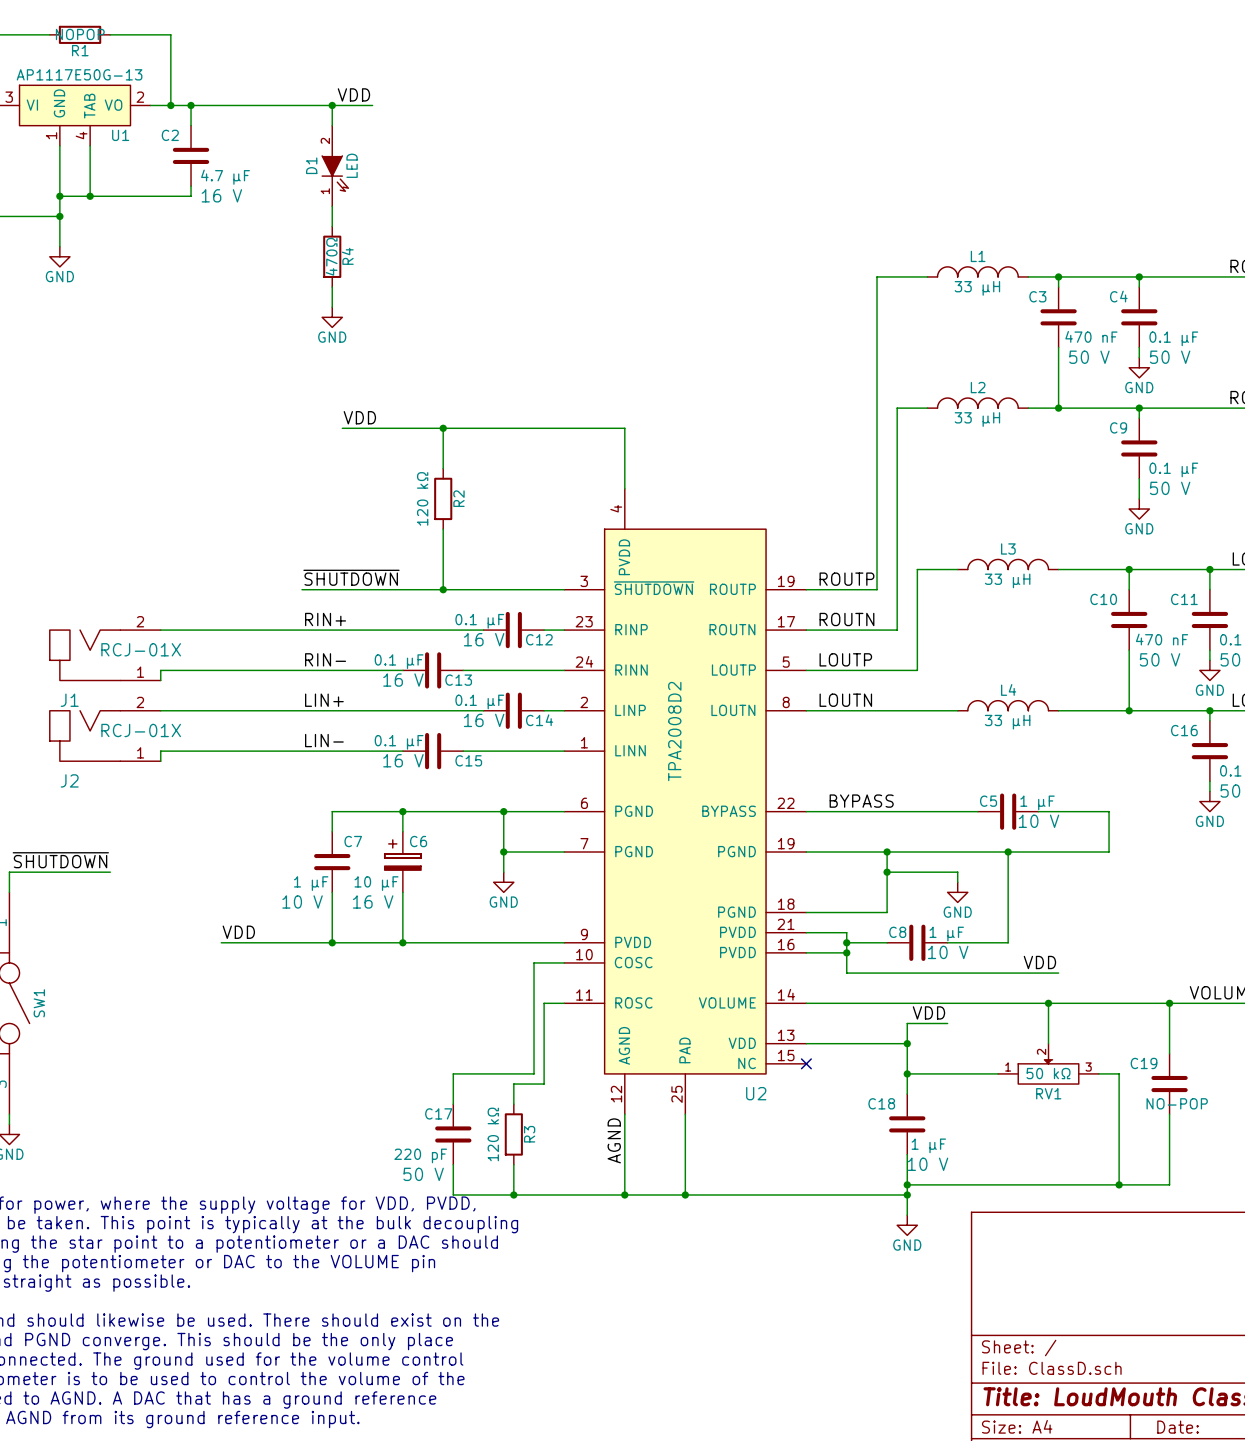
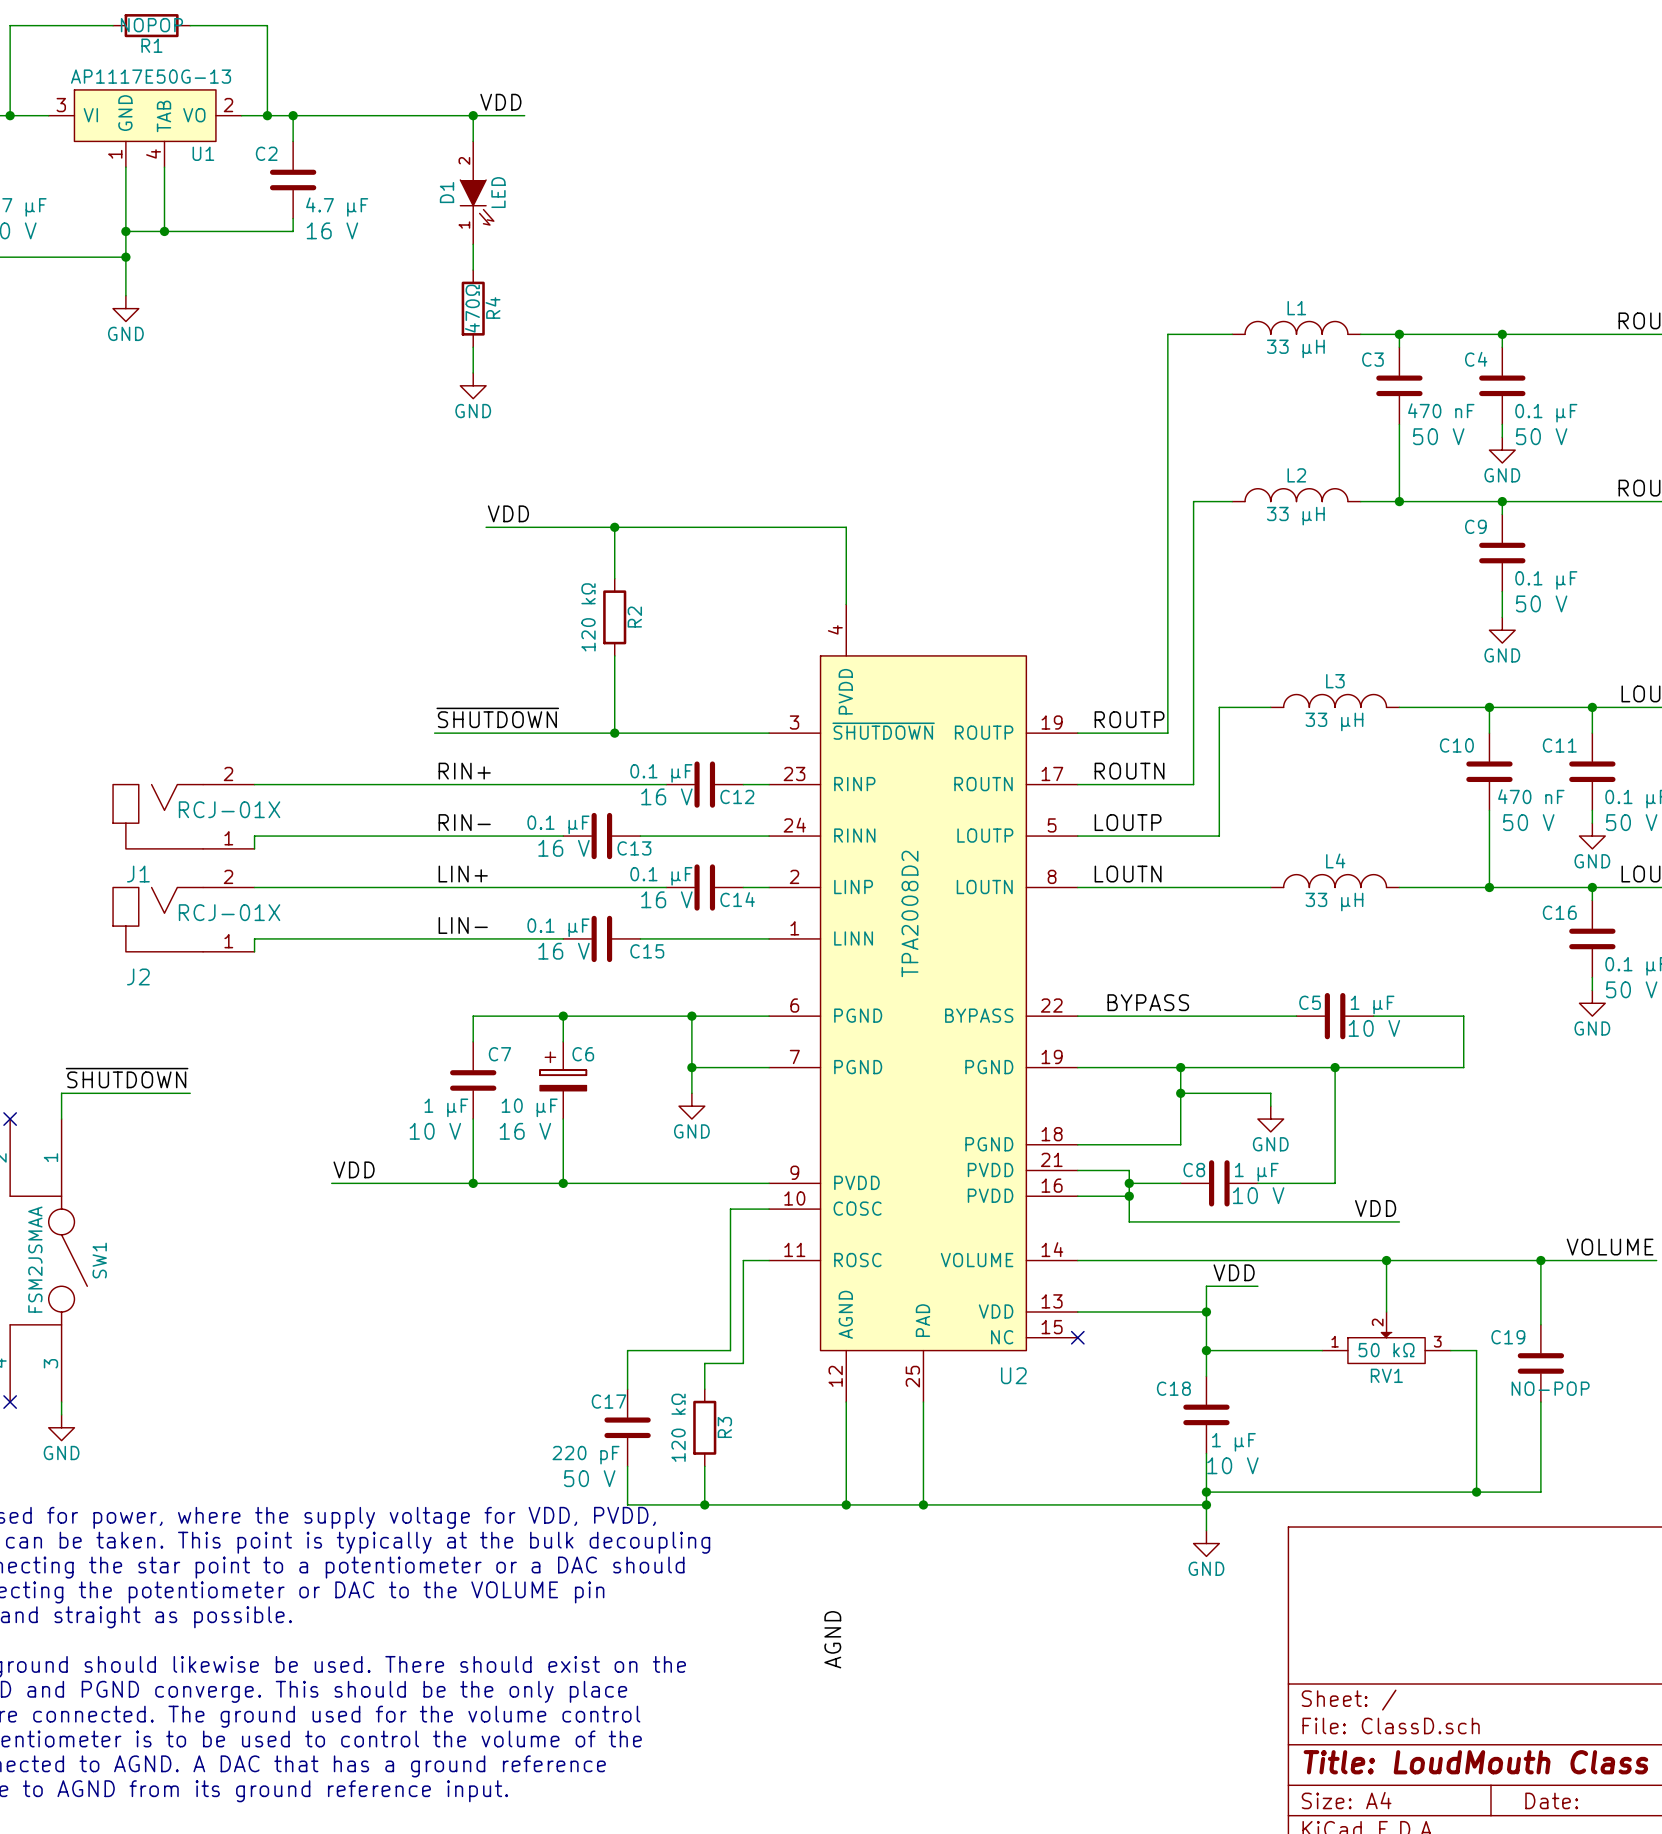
label position: AGND (614, 1140) -> AGND (832, 1639)

